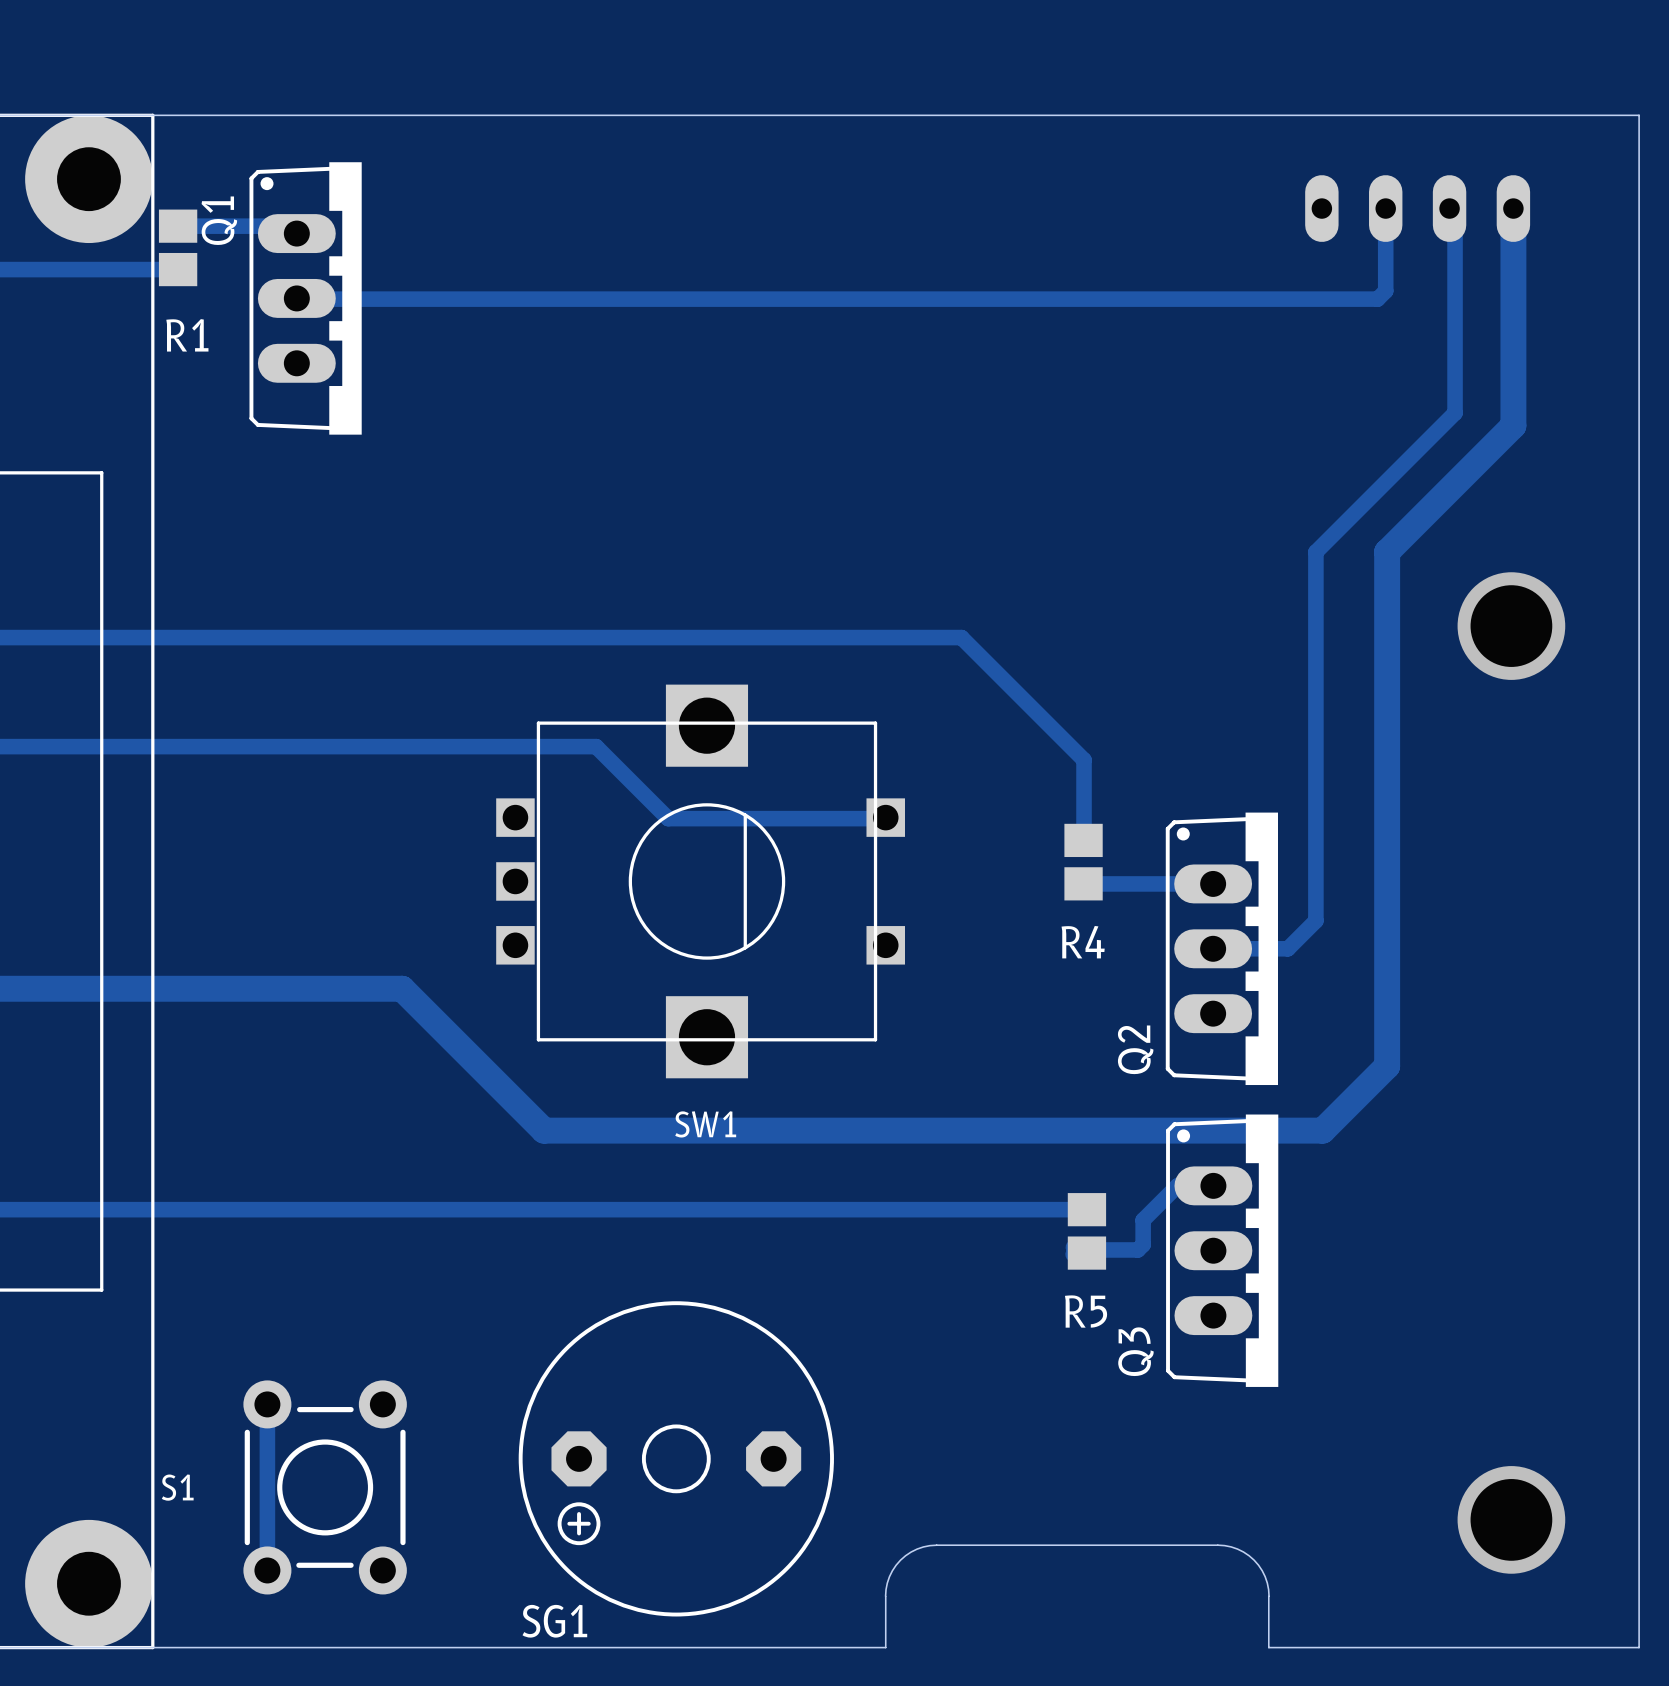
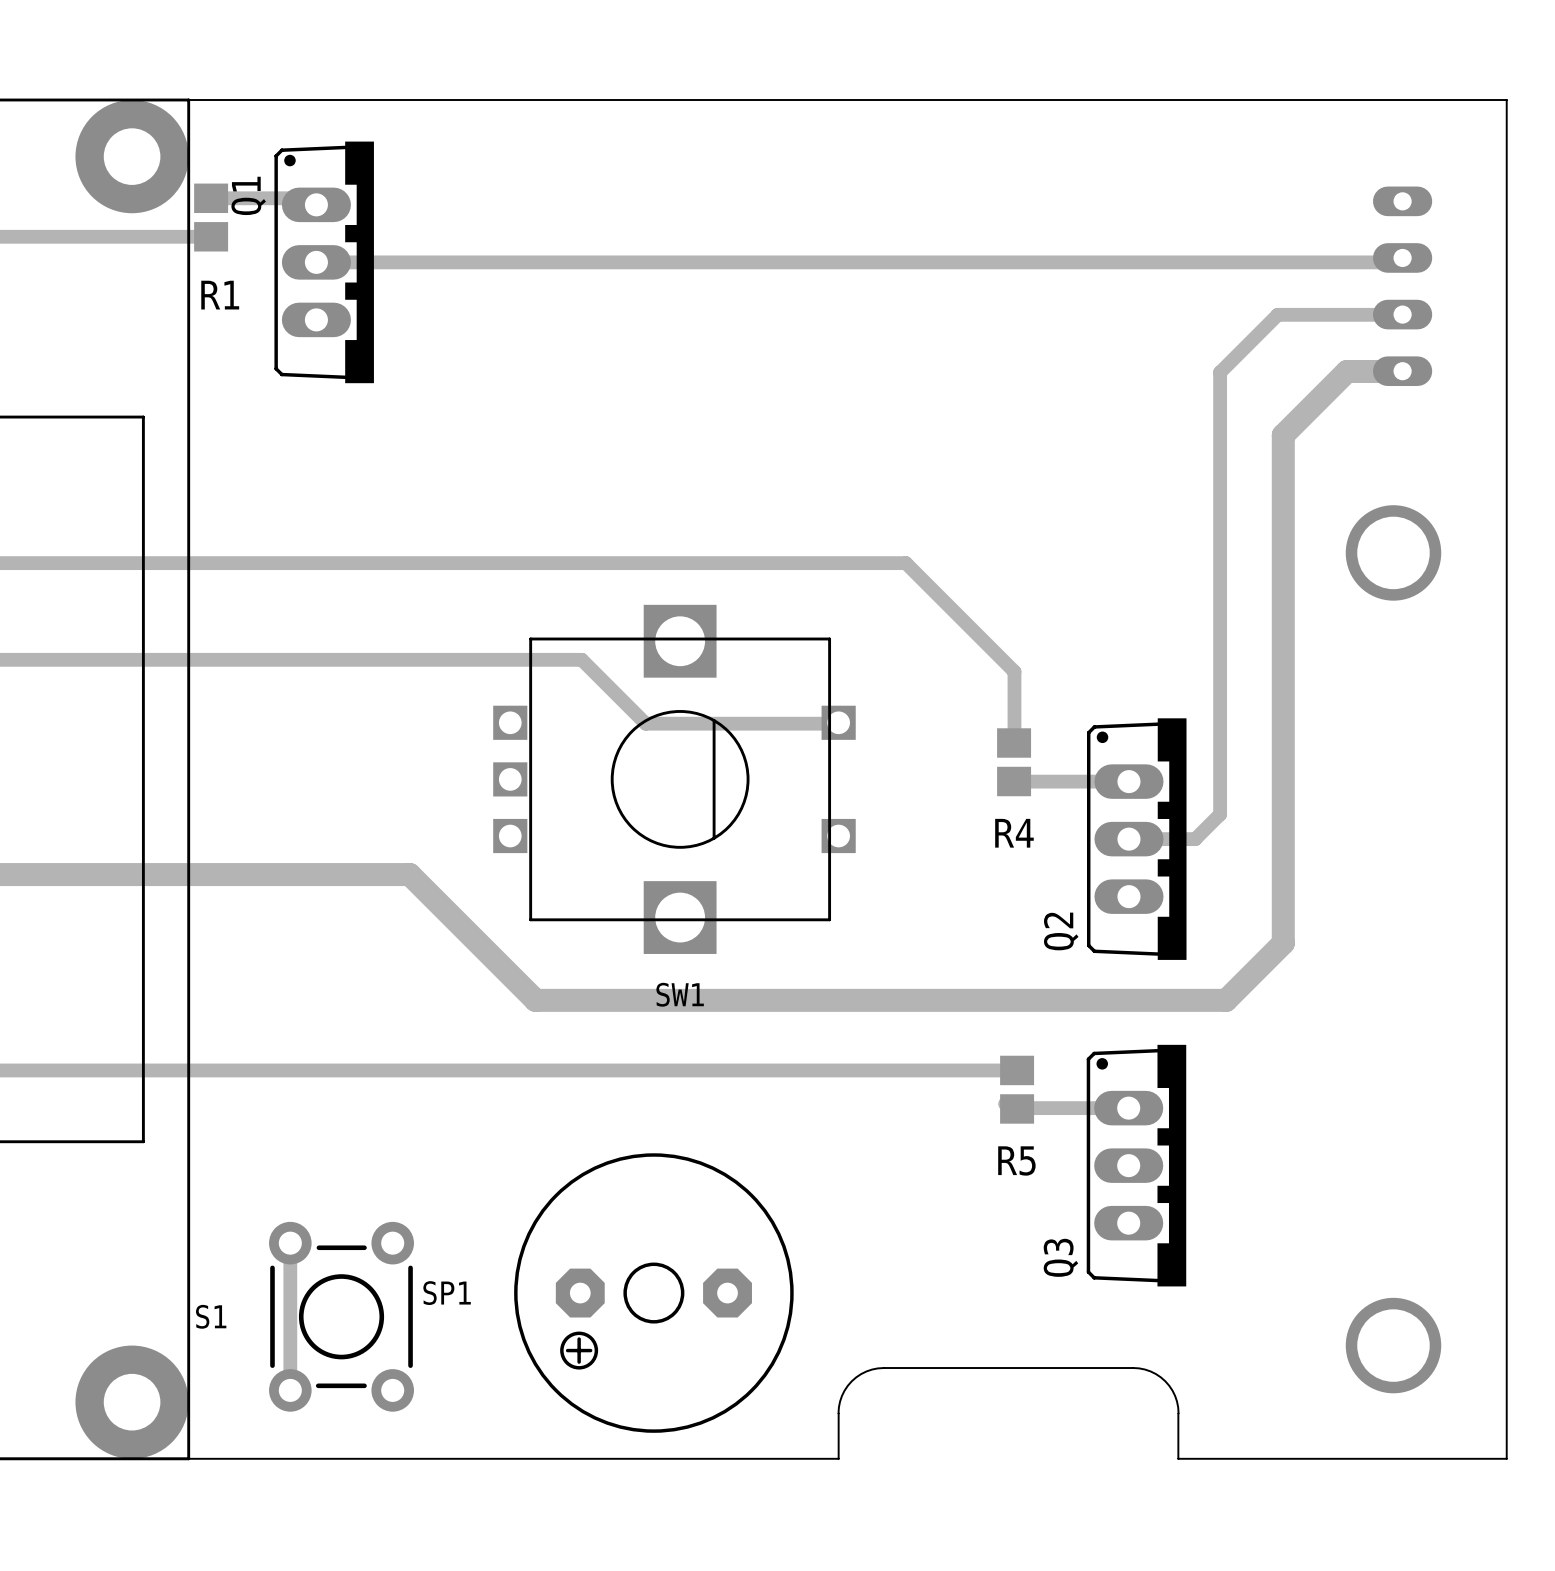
track: (1385, 208) (1385, 291) (1377, 299) (296, 298) -> (1402, 257) (1402, 262) (316, 262)
part rotation: 0° (1417, 208) -> 90° clockwise (1402, 286)
part position: (1417, 208) -> (1402, 286)
track: (1449, 208) (1455, 214) (1455, 412) (1315, 552) -> (1402, 314) (1277, 314) (1220, 372) (1220, 487)
track: (1513, 208) (1513, 425) (1387, 552) -> (1402, 371) (1347, 371) (1283, 435) (1283, 487)
track: (1213, 1185) (1177, 1185) (1143, 1220) (1143, 1244) (1137, 1249) (1077, 1249) (1073, 1254) -> none
Q3 position: (1222, 1250) -> (1136, 1165)
track: none -> (1009, 1108) (1128, 1108)
SG1: (676, 1458) -> none
SP1: none -> (653, 1293)

